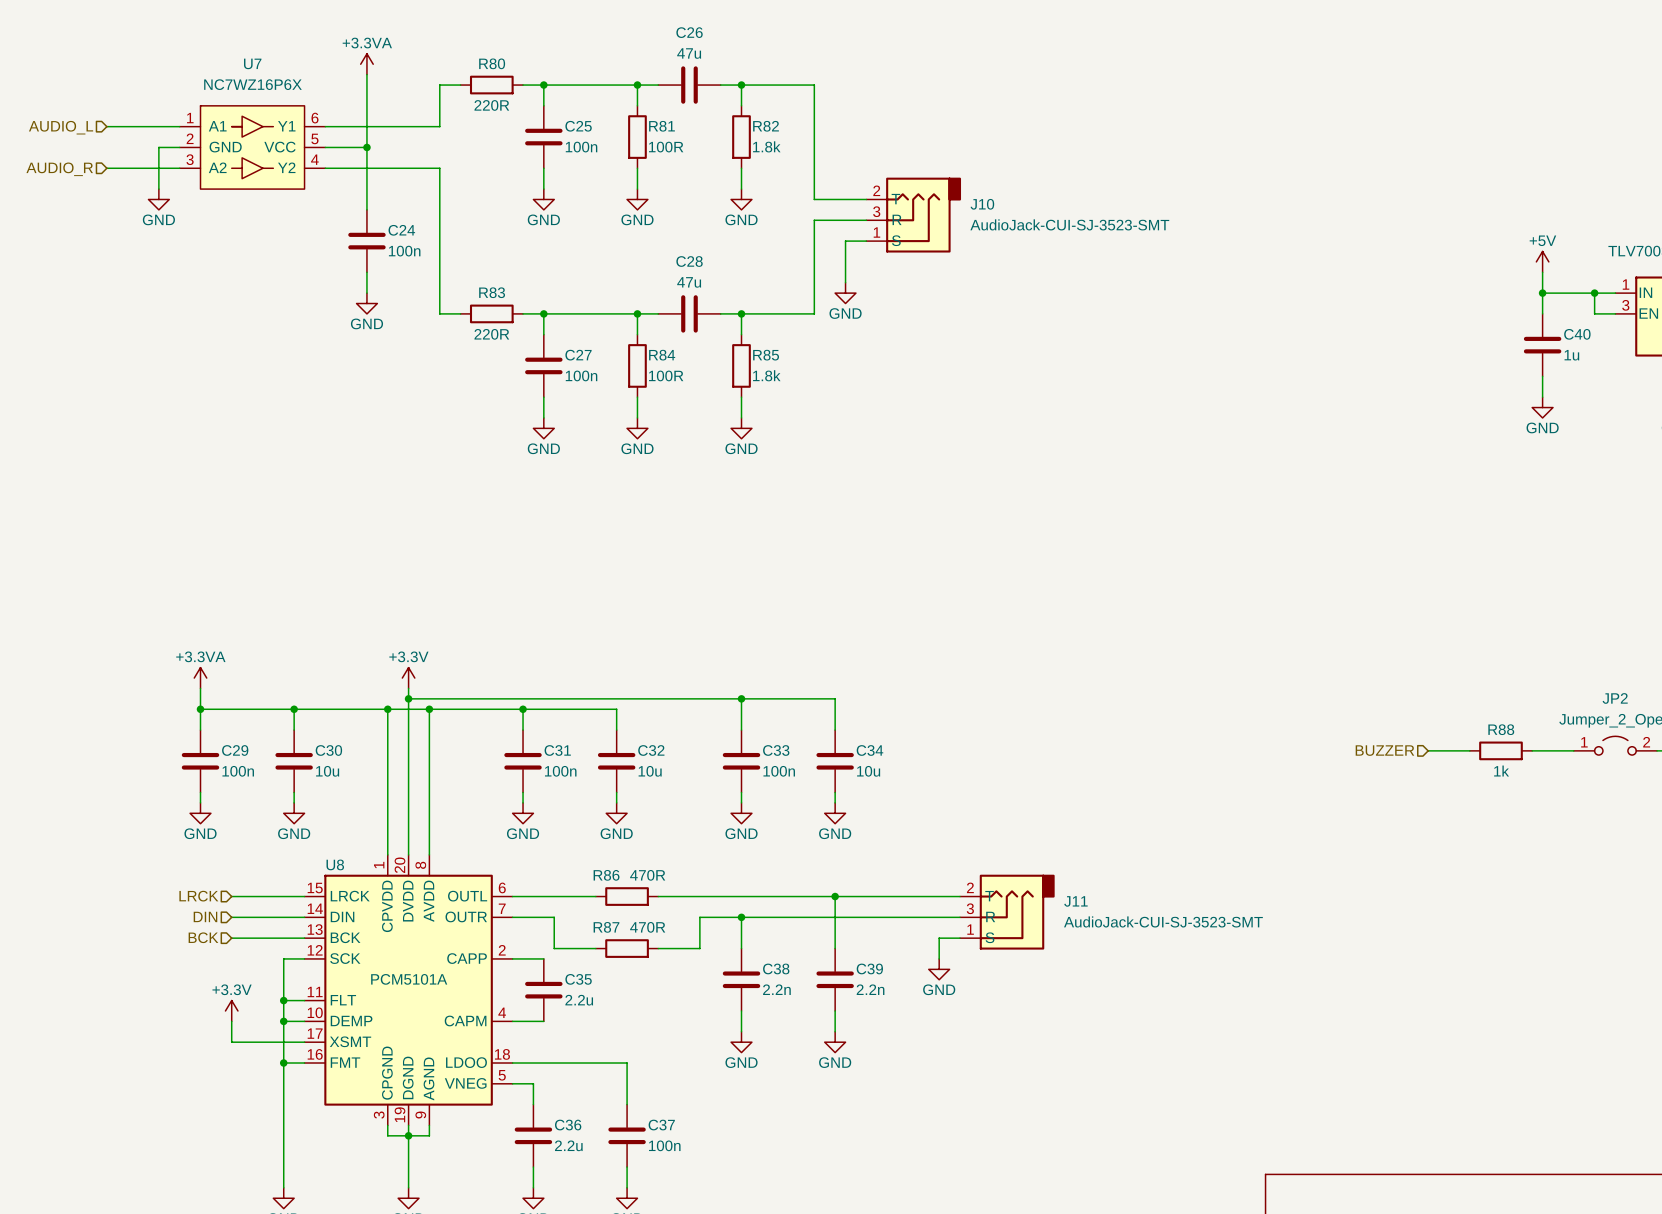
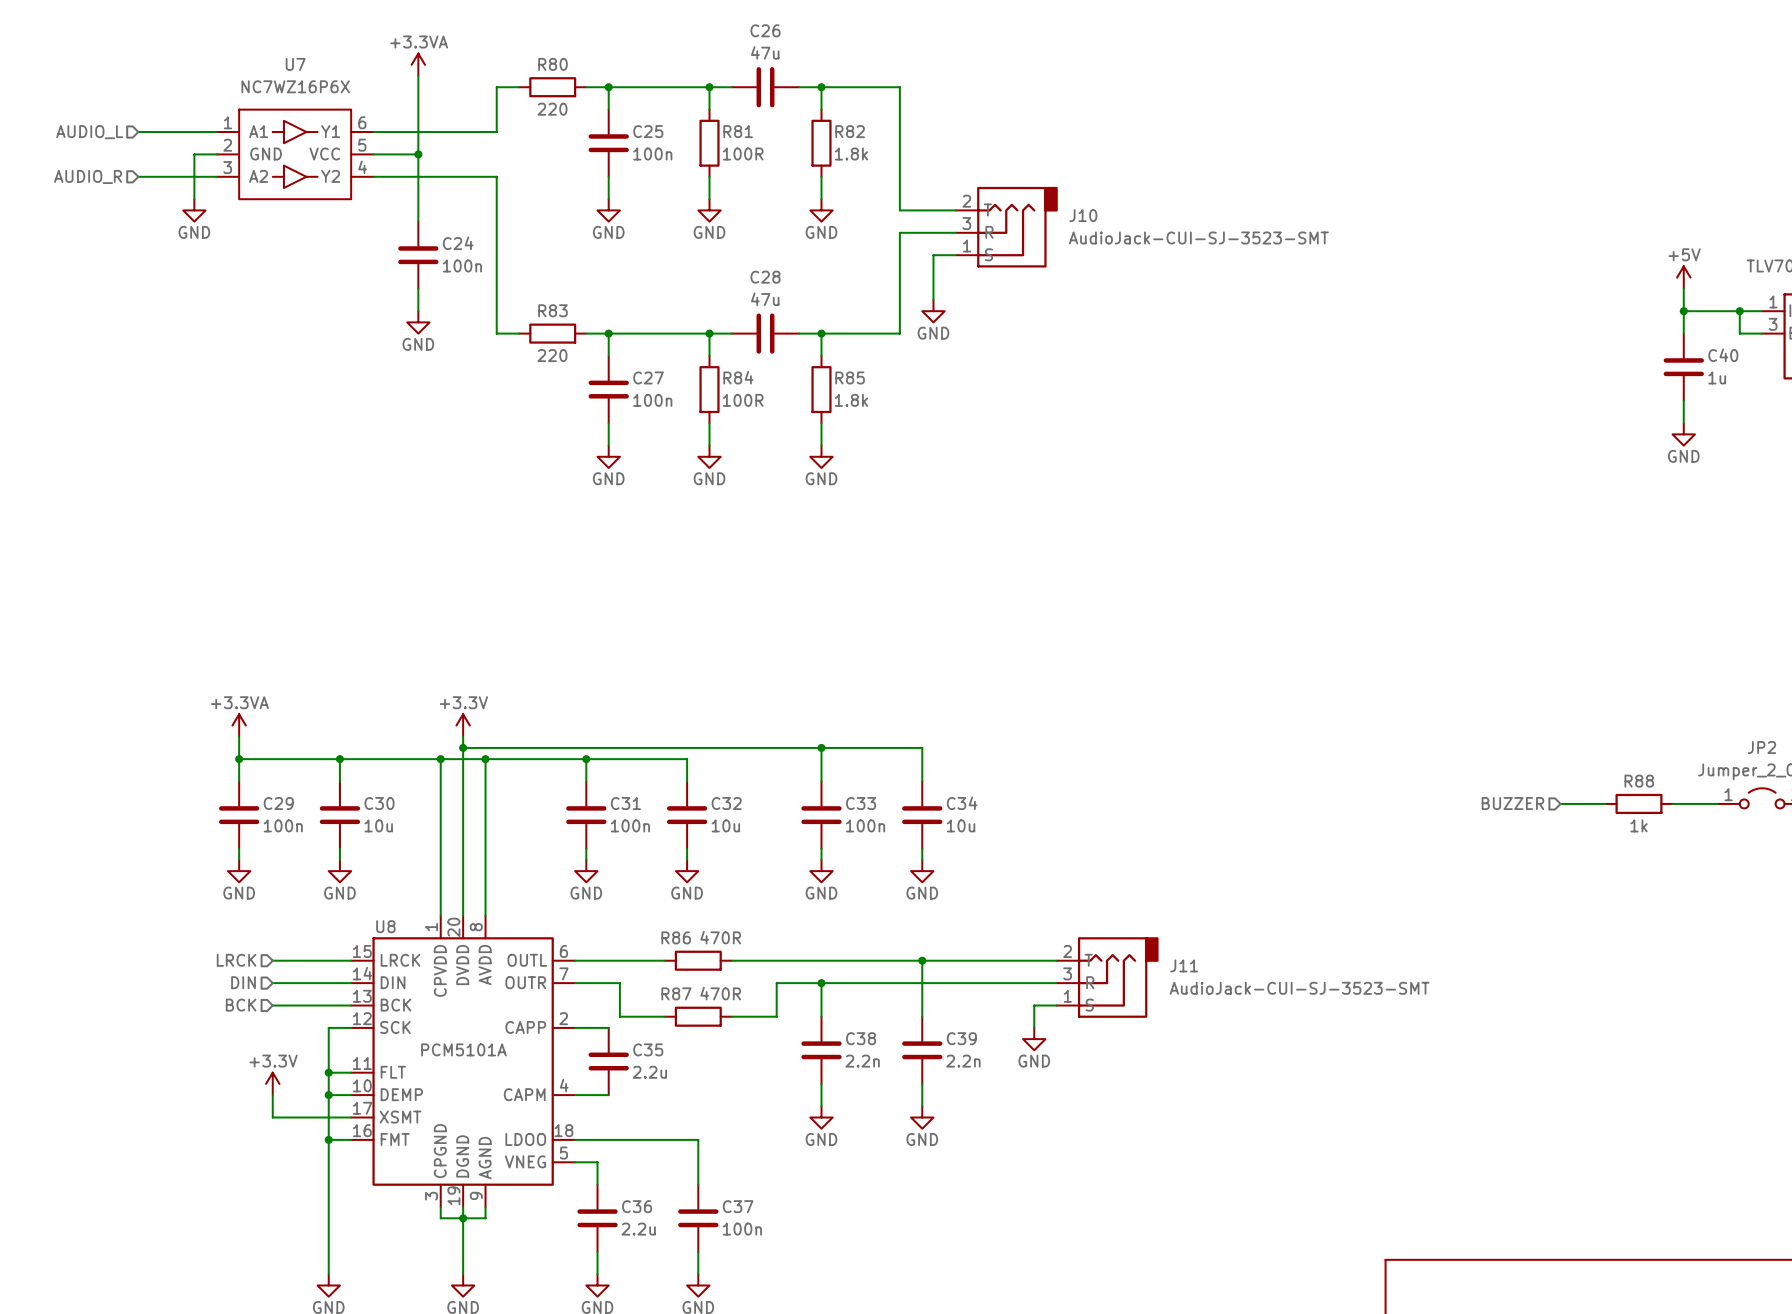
R80 value: 220R (491, 105) -> 220 (552, 109)
R83 value: 220R (491, 334) -> 220 (552, 355)

